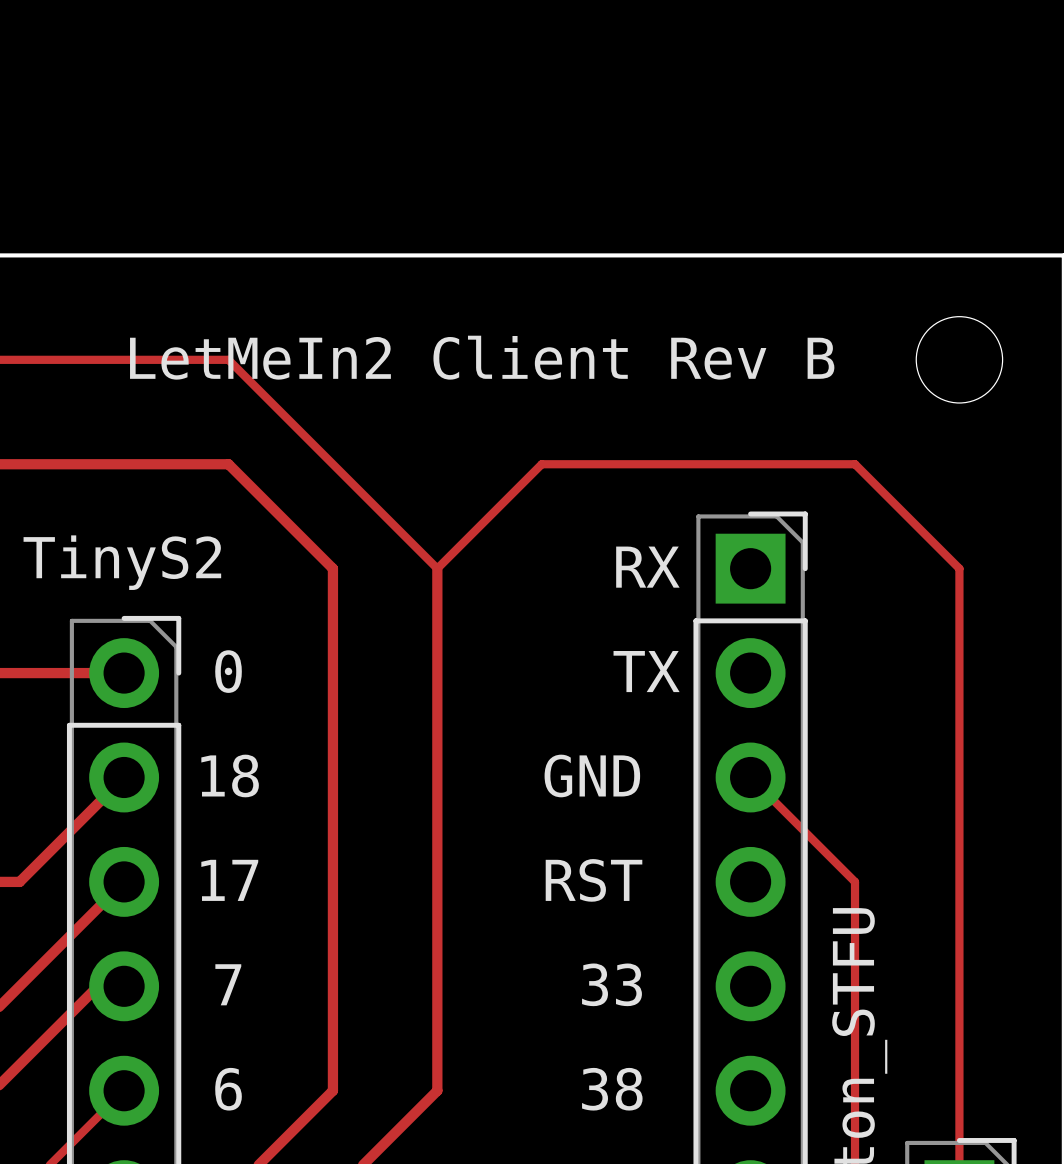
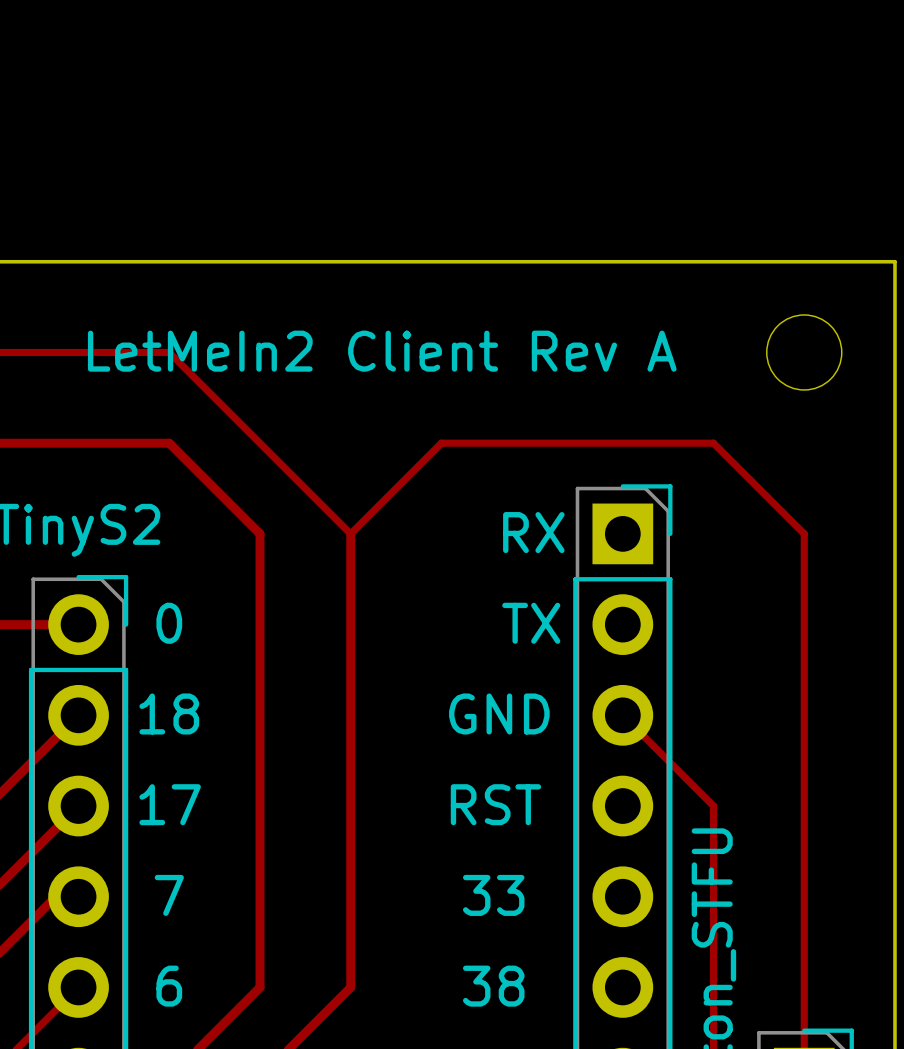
text: LetMeIn2 Client Rev B (482, 357) -> LetMeIn2 Client Rev A (382, 351)

